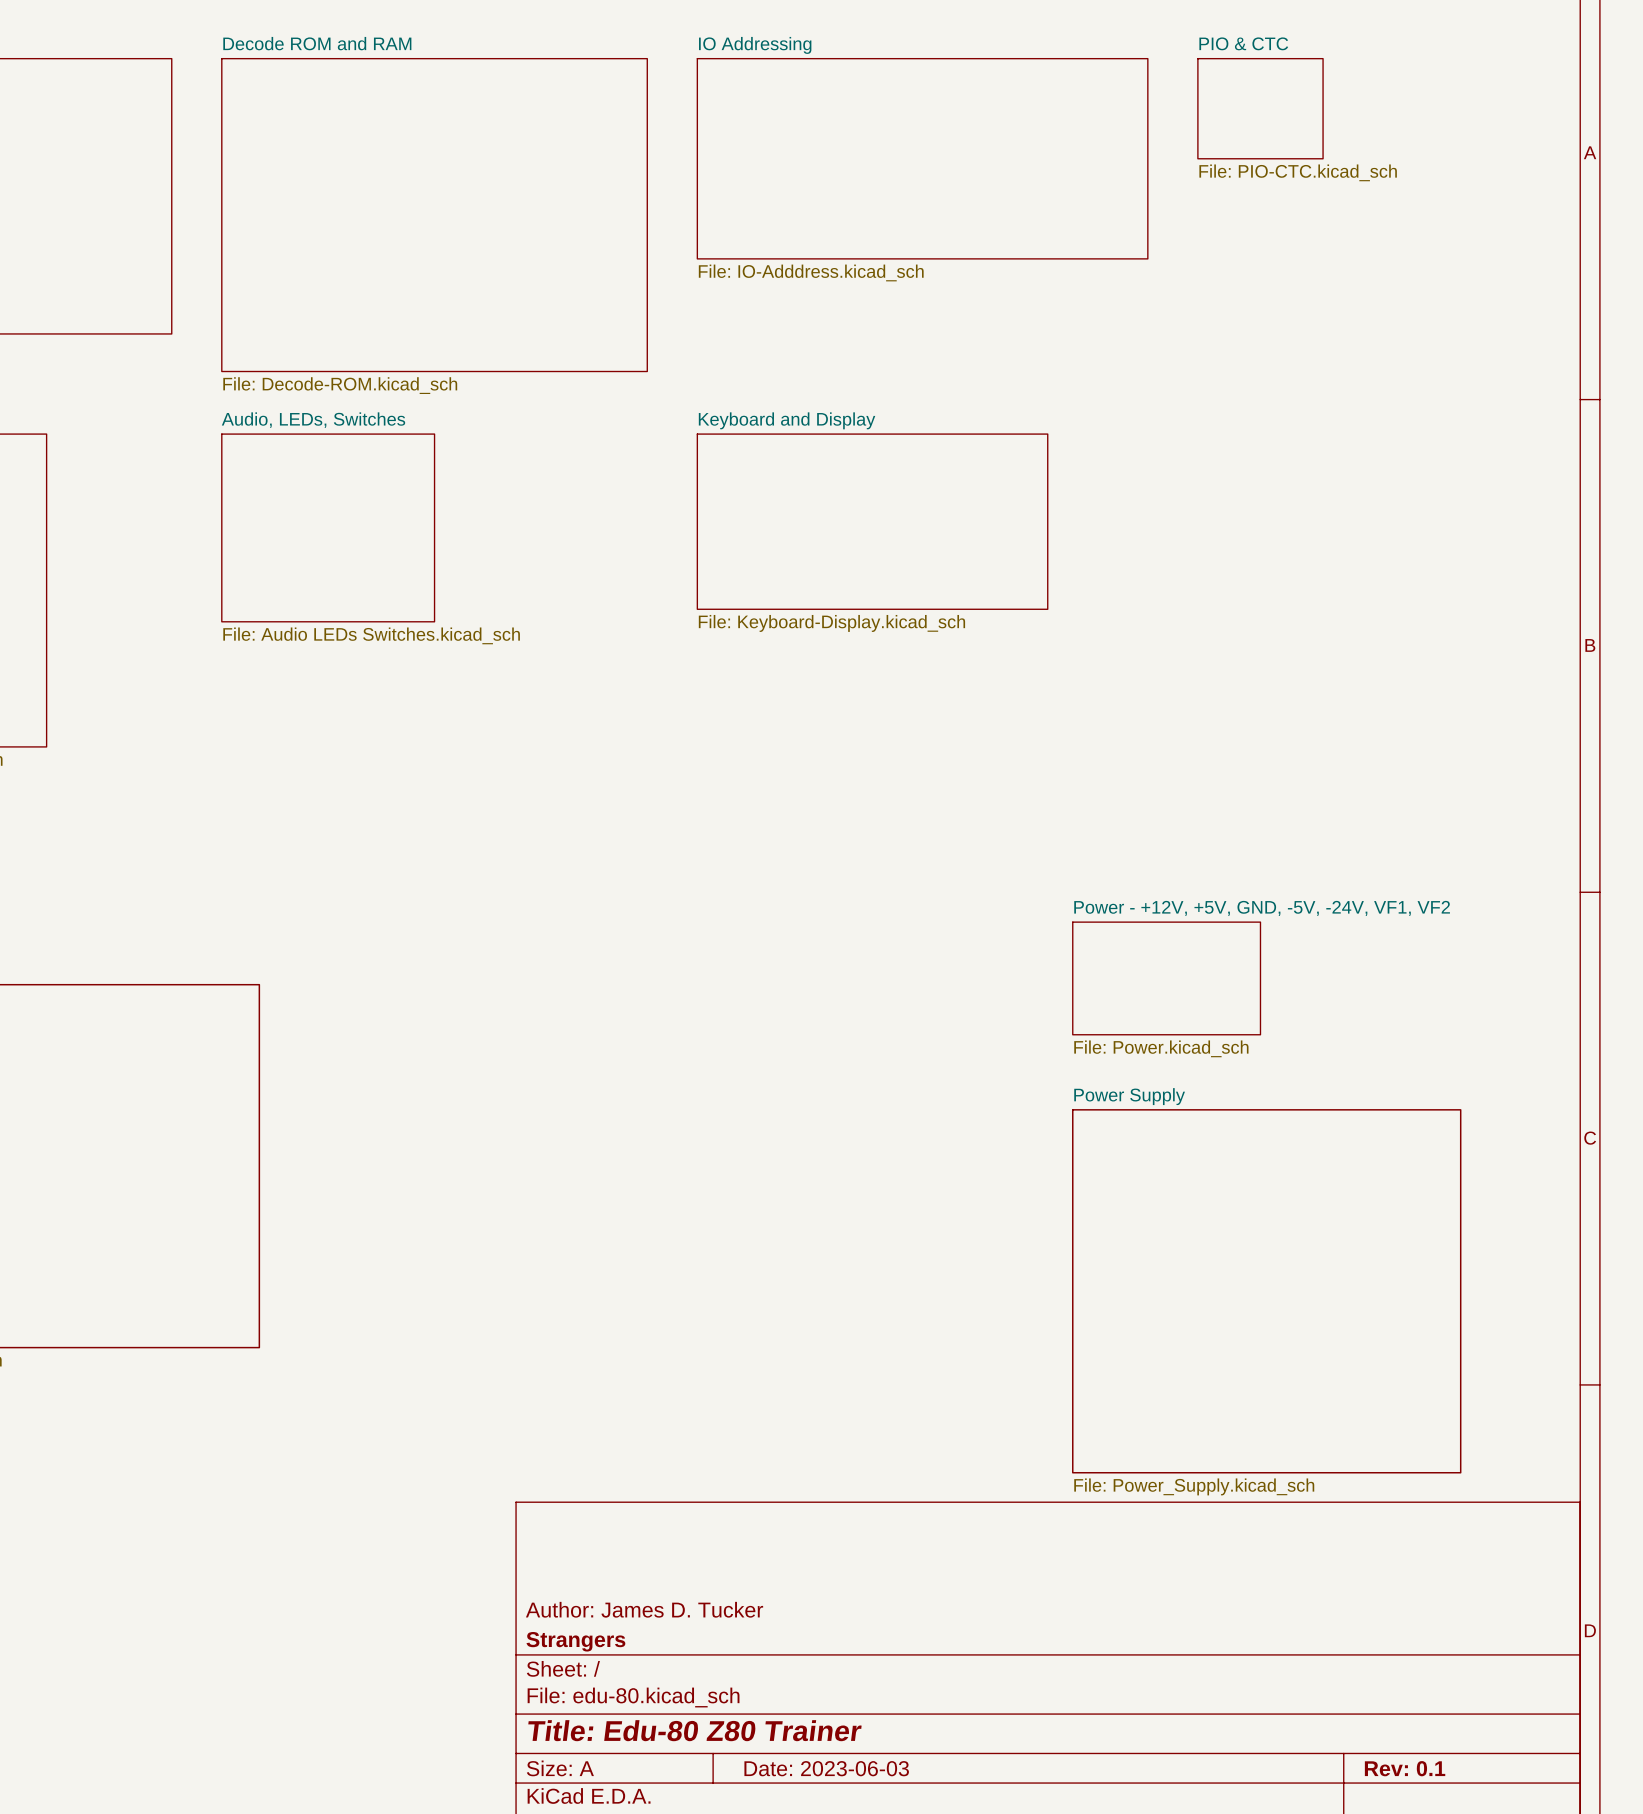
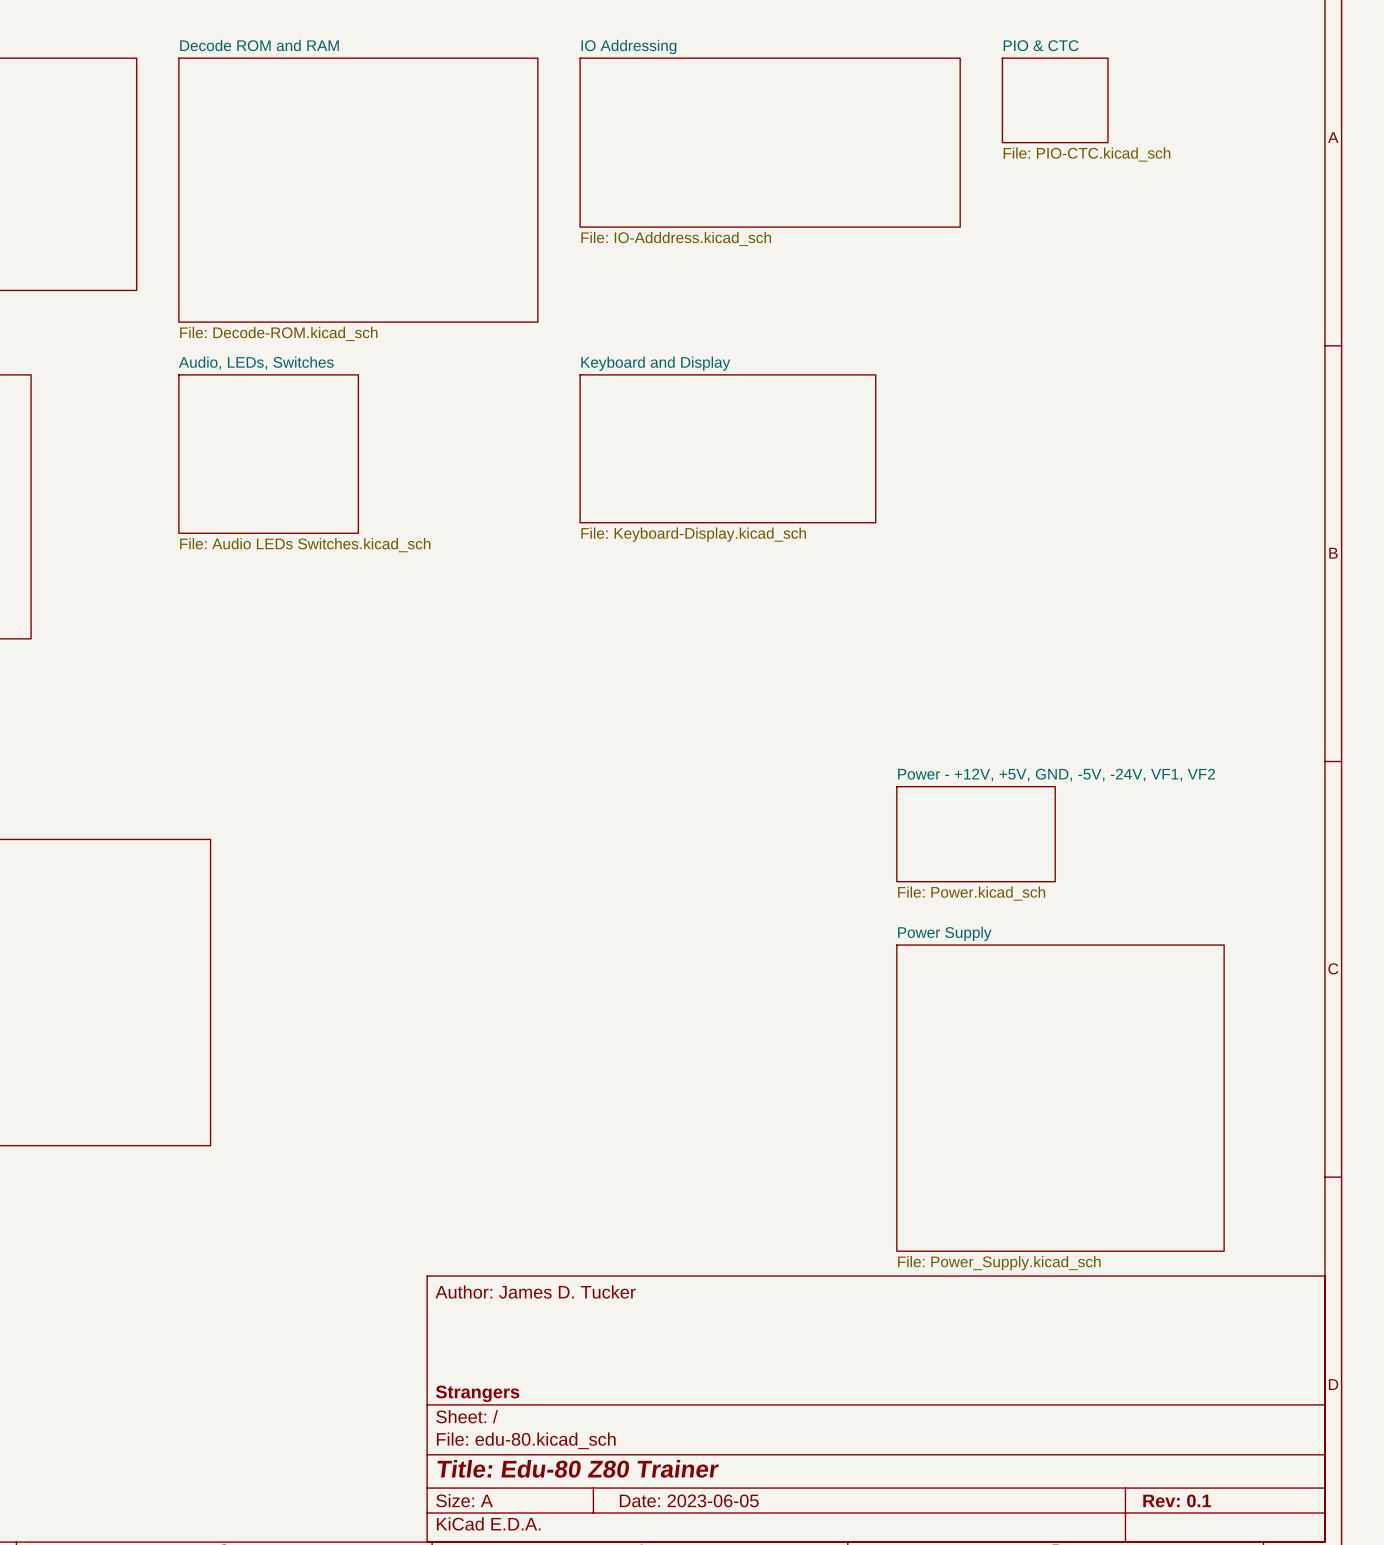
title block position: Author: James D. Tucker (644, 1609) -> Author: James D. Tucker (535, 1291)
title block: Date: 2023-06-03 (826, 1768) -> Date: 2023-06-05 (689, 1500)

